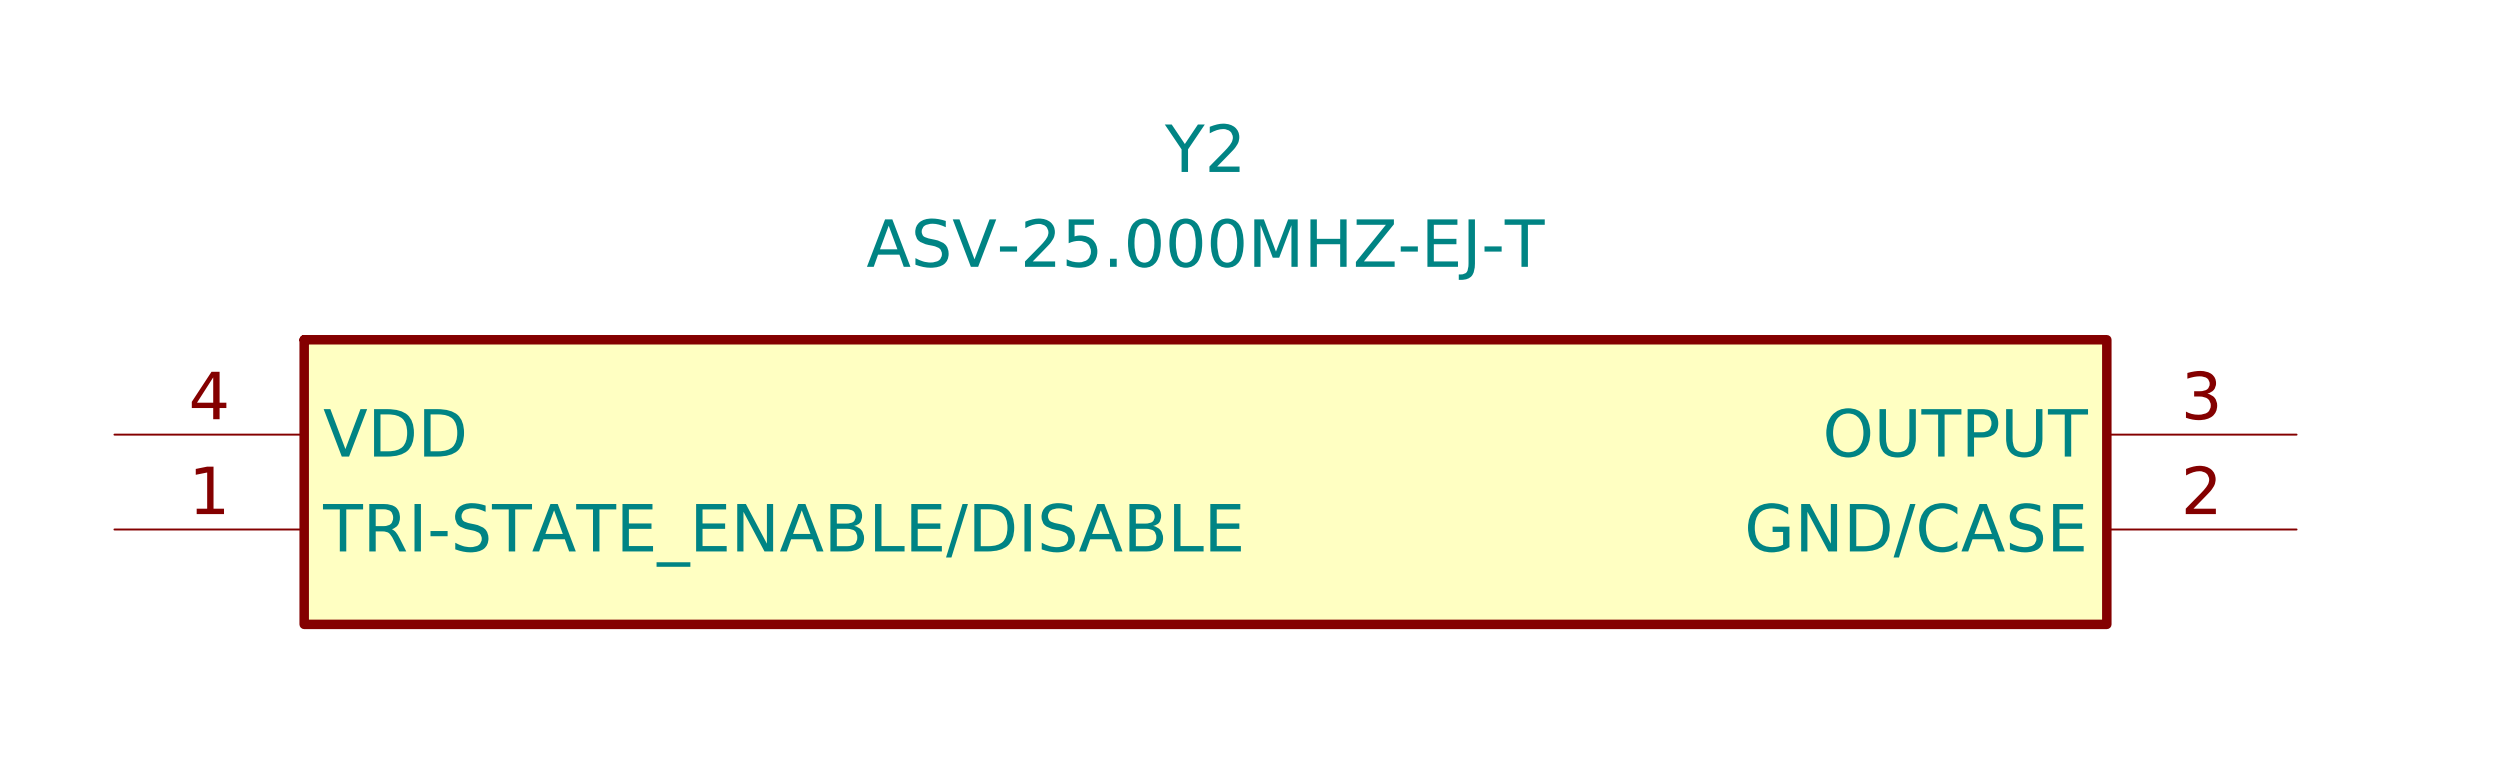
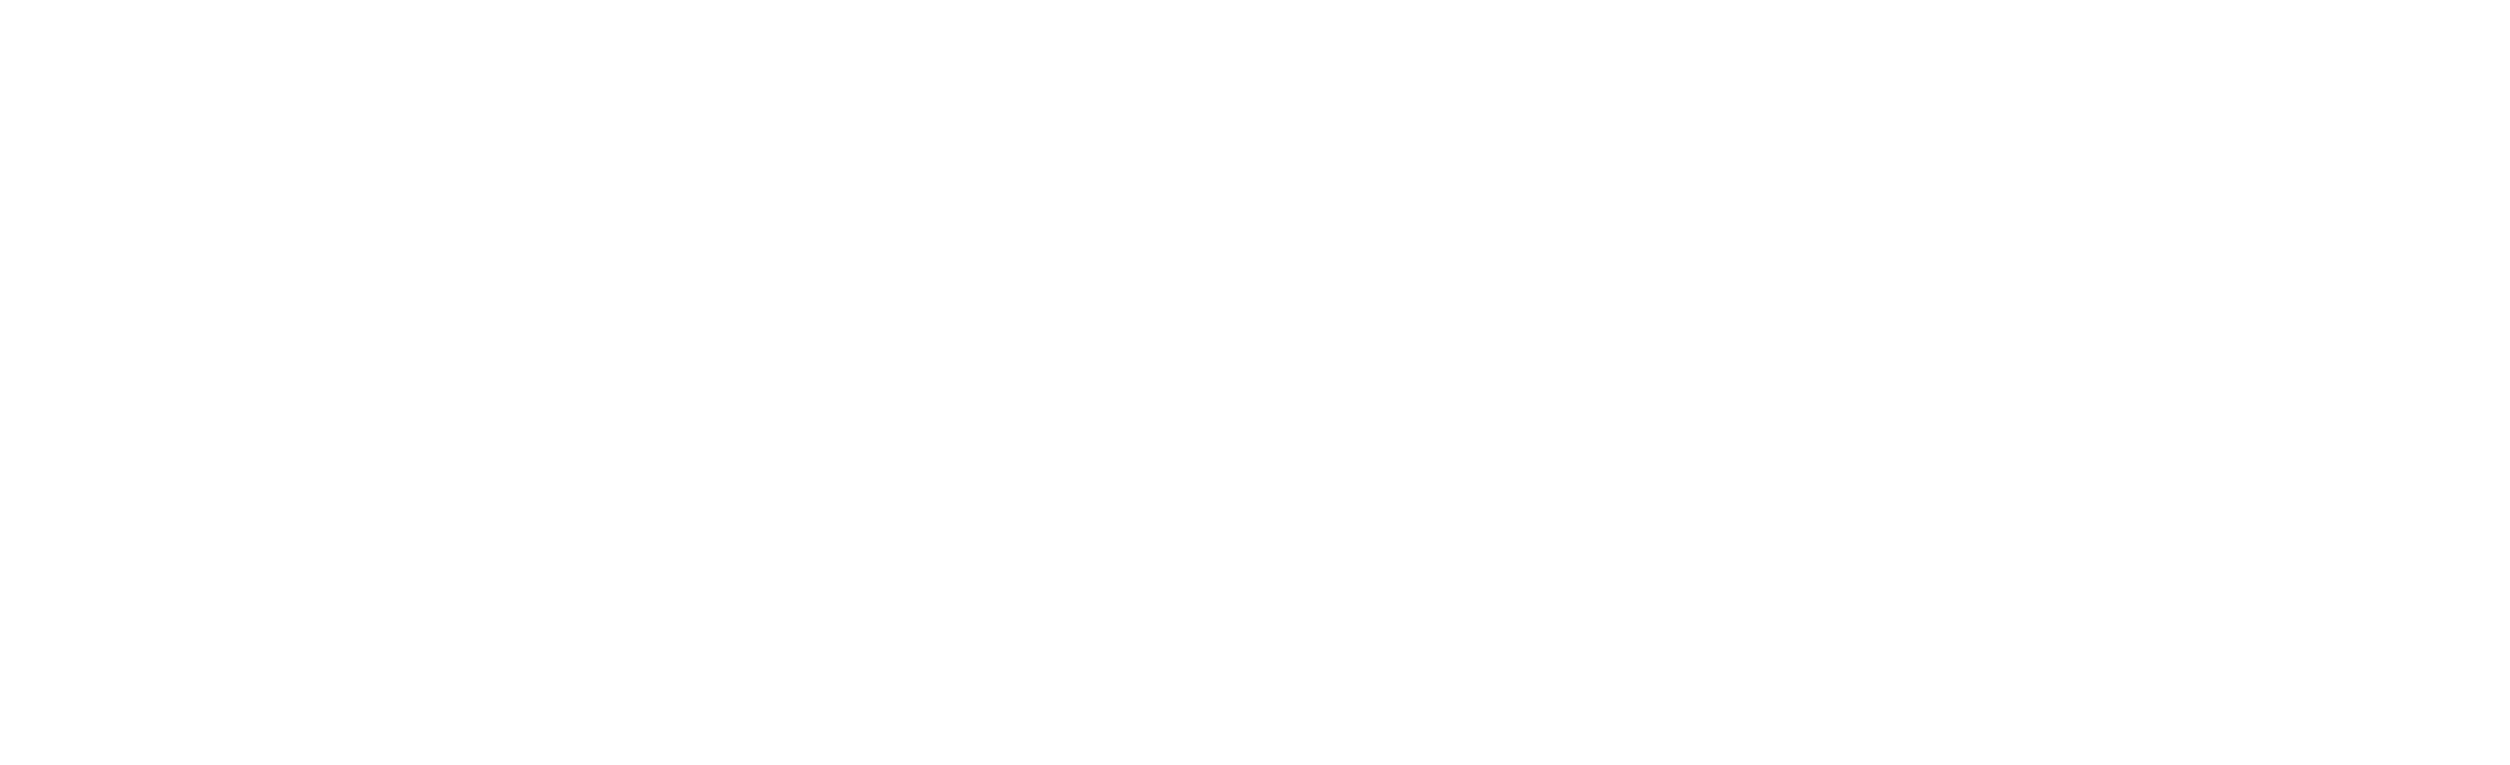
Y2: ASV-25.000MHZ-EJ-T (1205, 482) -> none

